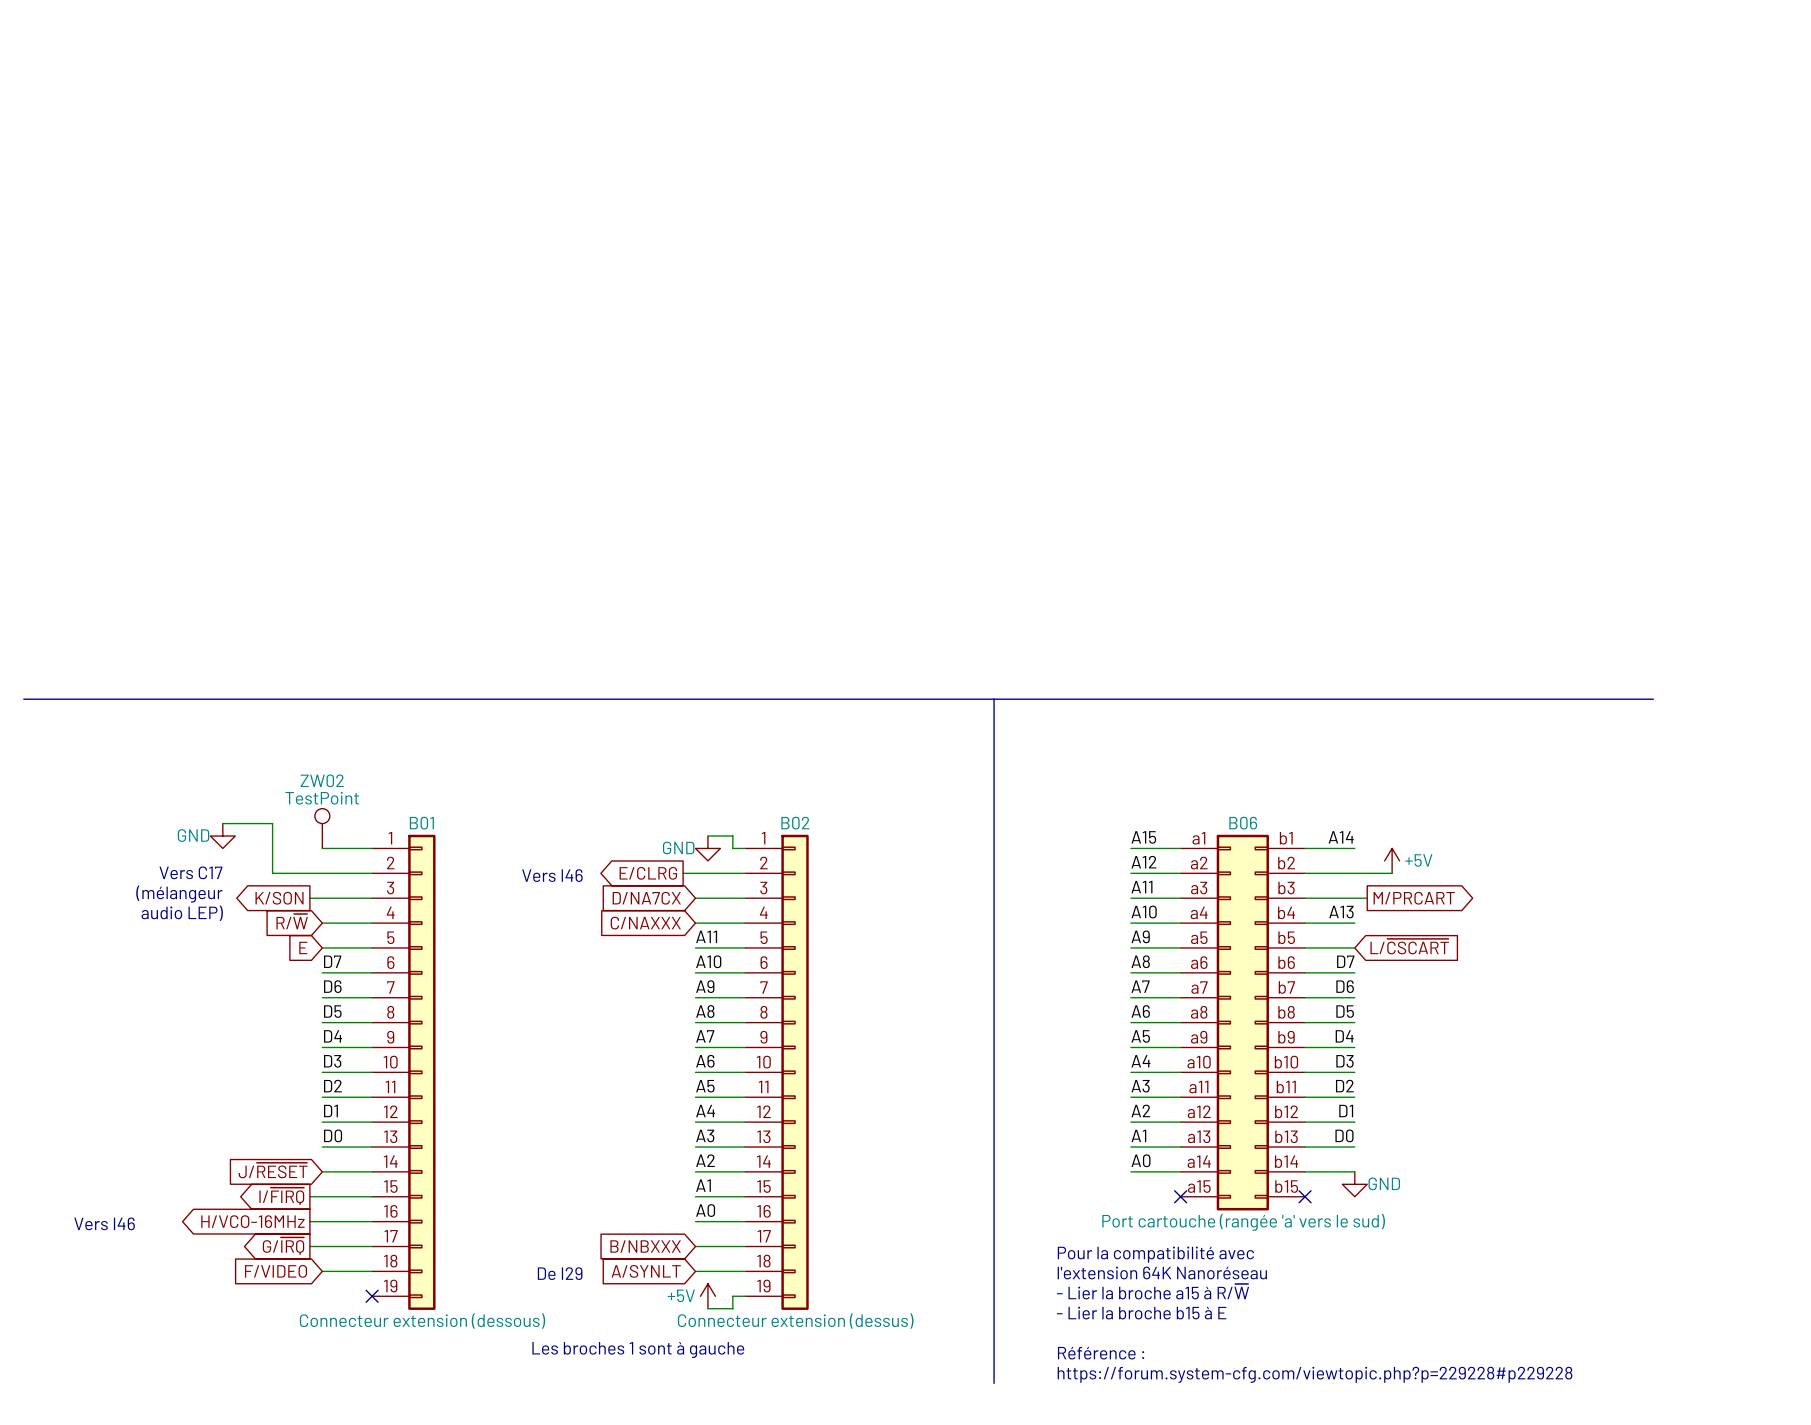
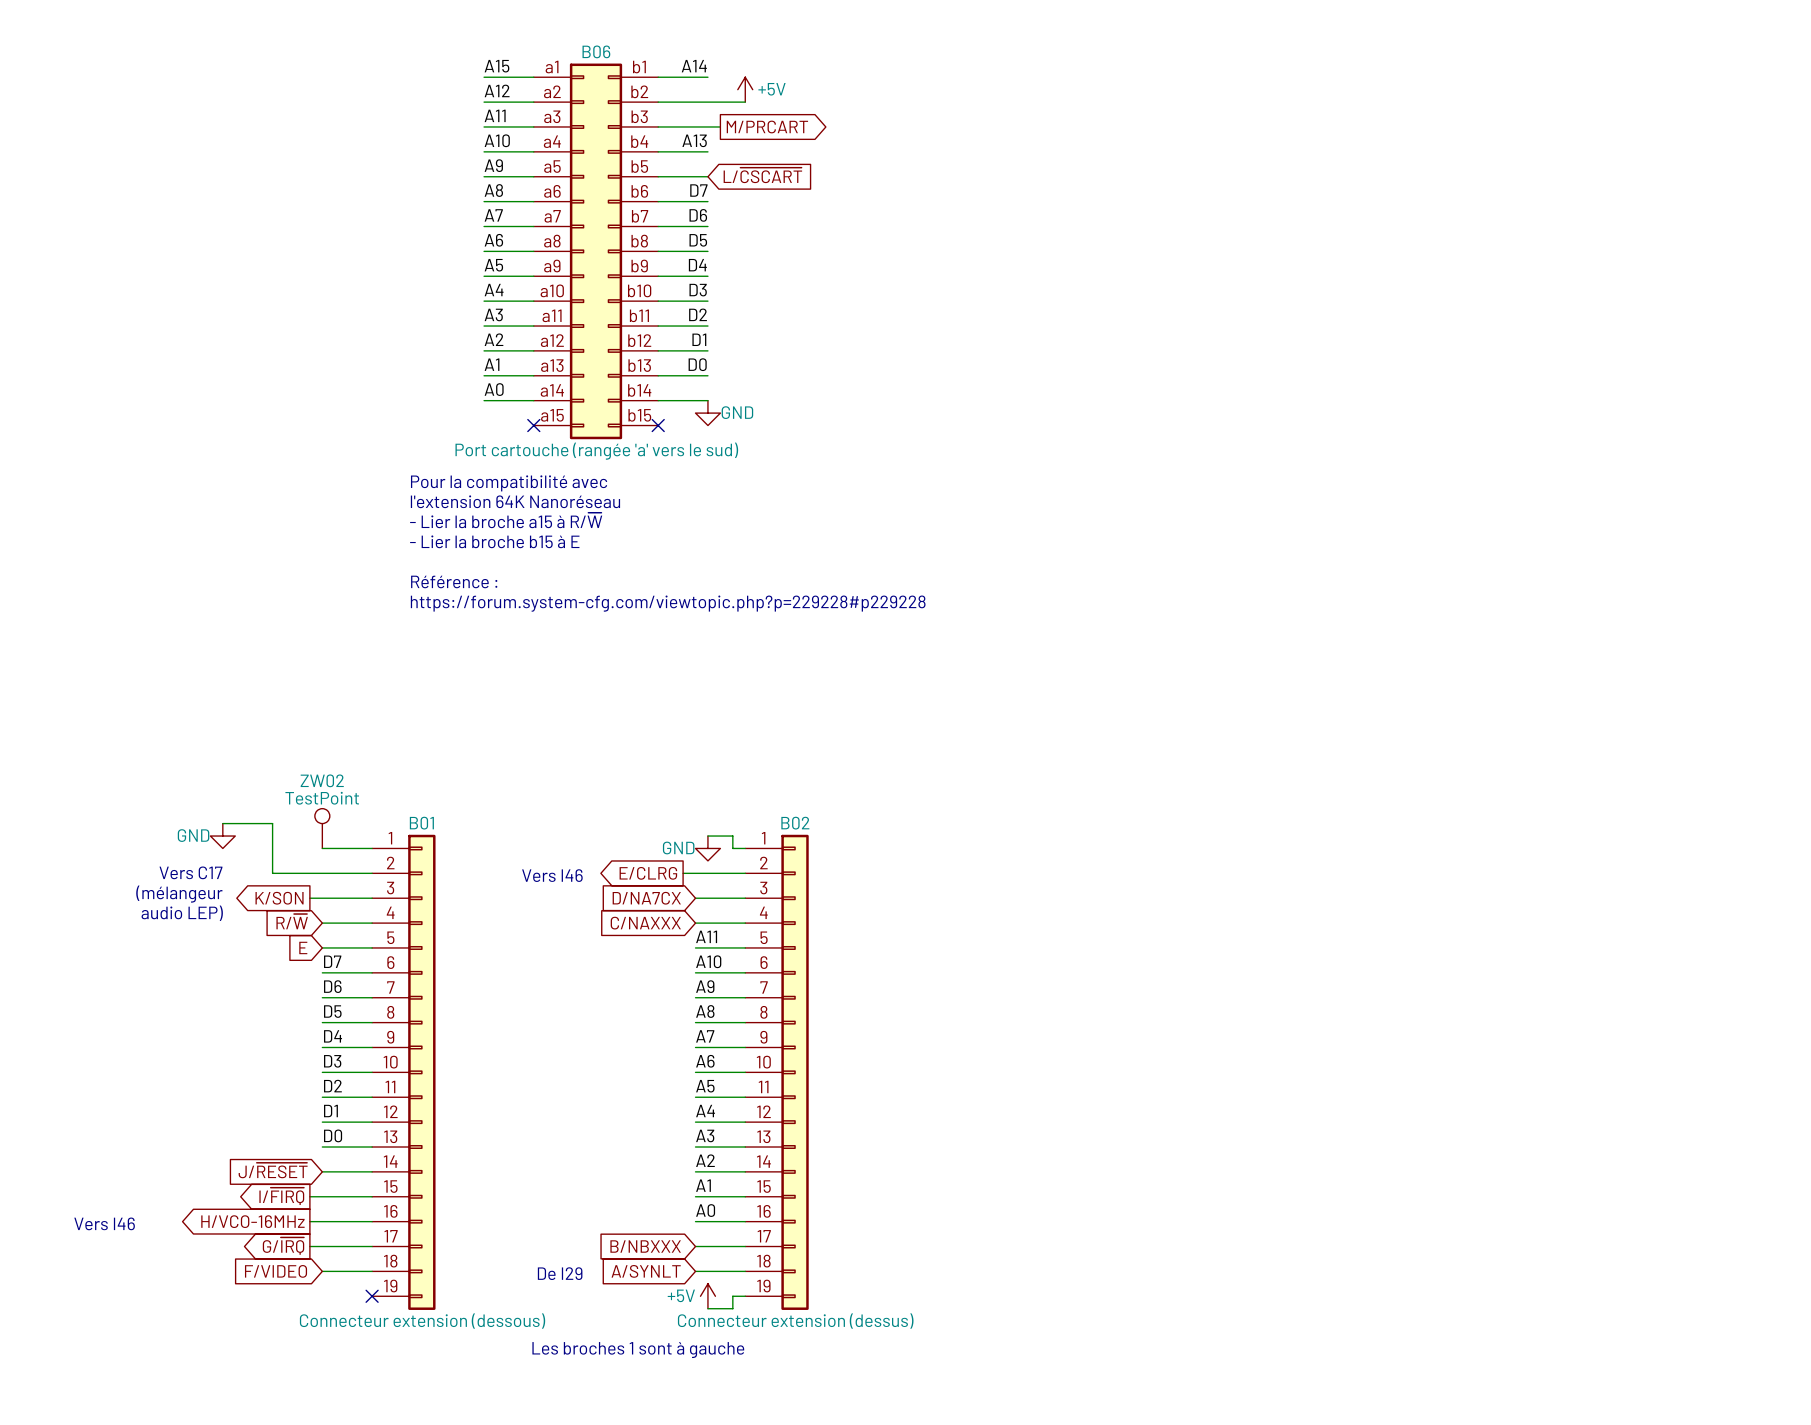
label: none -> A15 (496, 66)
label: none -> A14 (694, 66)
wire: none -> (484, 77) (533, 77)
wire: none -> (658, 77) (707, 77)
power symbol: none -> +5V (745, 89)
label: none -> A12 (497, 90)
wire: none -> (484, 102) (533, 102)
wire: none -> (658, 102) (745, 102)
label: none -> A11 (495, 115)
wire: none -> (484, 126) (533, 126)
wire: none -> (658, 126) (720, 126)
global label: none -> M/PRCART (767, 127)
label: none -> A10 (497, 140)
label: none -> A13 (694, 140)
wire: none -> (484, 151) (533, 151)
wire: none -> (658, 151) (707, 151)
label: none -> A9 (493, 165)
global label: none -> L/~{CSCART} (762, 175)
wire: none -> (484, 176) (533, 176)
wire: none -> (658, 176) (707, 176)
label: none -> A8 (493, 190)
label: none -> D7 (698, 190)
wire: none -> (484, 201) (533, 201)
wire: none -> (658, 201) (707, 201)
label: none -> A7 (493, 215)
label: none -> D6 (698, 215)
wire: none -> (484, 226) (533, 226)
wire: none -> (658, 226) (707, 226)
label: none -> A6 (493, 240)
label: none -> D5 (698, 240)
wire: none -> (484, 251) (533, 251)
wire: none -> (658, 251) (707, 251)
label: none -> A5 (493, 265)
label: none -> D4 (697, 265)
wire: none -> (484, 276) (533, 276)
wire: none -> (658, 276) (707, 276)
label: none -> A4 (494, 290)
label: none -> D3 (698, 290)
wire: none -> (484, 301) (533, 301)
wire: none -> (658, 301) (707, 301)
label: none -> A3 (493, 314)
label: none -> D2 (698, 314)
wire: none -> (484, 326) (533, 326)
wire: none -> (658, 326) (707, 326)
label: none -> A2 (493, 339)
label: none -> D1 (699, 339)
wire: none -> (484, 350) (533, 350)
wire: none -> (658, 350) (707, 350)
label: none -> A1 (492, 364)
label: none -> D0 (697, 364)
wire: none -> (484, 375) (533, 375)
wire: none -> (658, 375) (707, 375)
label: none -> A0 (494, 389)
wire: none -> (484, 400) (533, 400)
wire: none -> (658, 400) (707, 400)
power symbol: none -> GND (707, 413)
no-connect mark: none -> (533, 425)
no-connect mark: none -> (658, 425)
text: none -> Pour la compatibilité avec (509, 483)
text: none -> l'extension 64K Nanoréseau (515, 501)
text: none -> - Lier la broche a15 à R/~{W} (506, 520)
text: none -> - Lier la broche b15 à E (494, 541)
text: none -> Référence : (454, 581)
text: none -> https://forum.system-cfg.com/viewtopic.php?p=229228#p229228 (668, 603)
line: (23, 699) (1653, 699) -> none
line: (994, 699) (994, 1383) -> none
label: A15 (1143, 837) -> none
label: A14 (1341, 837) -> none
wire: (1130, 848) (1180, 848) -> none
wire: (1305, 848) (1354, 848) -> none
power symbol: +5V (1392, 860) -> none
label: A12 (1143, 862) -> none
wire: (1130, 873) (1180, 873) -> none
wire: (1305, 873) (1392, 873) -> none
label: A11 (1141, 887) -> none
wire: (1130, 898) (1180, 898) -> none
wire: (1305, 898) (1367, 898) -> none
global label: M/PRCART (1414, 898) -> none
label: A10 (1144, 912) -> none
label: A13 (1341, 912) -> none
wire: (1130, 923) (1180, 923) -> none
wire: (1305, 923) (1354, 923) -> none
label: A9 (1140, 936) -> none
global label: L/~{CSCART} (1409, 946) -> none
wire: (1130, 947) (1180, 947) -> none
wire: (1305, 947) (1354, 947) -> none
label: A8 (1140, 961) -> none
label: D7 (1345, 961) -> none
wire: (1130, 972) (1180, 972) -> none
wire: (1305, 972) (1354, 972) -> none
label: A7 (1140, 986) -> none
label: D6 (1345, 986) -> none
wire: (1130, 997) (1180, 997) -> none
wire: (1305, 997) (1354, 997) -> none
label: A6 (1140, 1011) -> none
label: D5 (1345, 1011) -> none
wire: (1130, 1022) (1180, 1022) -> none
B06 position: (1242, 1022) -> (596, 251)
wire: (1305, 1022) (1354, 1022) -> none
label: A5 (1140, 1036) -> none
label: D4 (1344, 1036) -> none
wire: (1130, 1047) (1180, 1047) -> none
wire: (1305, 1047) (1354, 1047) -> none
label: A4 (1140, 1061) -> none
label: D3 (1344, 1061) -> none
wire: (1130, 1072) (1180, 1072) -> none
wire: (1305, 1072) (1354, 1072) -> none
label: A3 (1140, 1086) -> none
label: D2 (1344, 1086) -> none
wire: (1130, 1097) (1180, 1097) -> none
wire: (1305, 1097) (1354, 1097) -> none
label: A2 (1140, 1110) -> none
label: D1 (1346, 1111) -> none
wire: (1130, 1122) (1180, 1122) -> none
wire: (1305, 1122) (1354, 1122) -> none
label: A1 (1138, 1135) -> none
label: D0 (1344, 1135) -> none
wire: (1130, 1147) (1180, 1147) -> none
wire: (1305, 1147) (1354, 1147) -> none
label: A0 (1140, 1160) -> none
wire: (1130, 1171) (1180, 1171) -> none
wire: (1305, 1171) (1354, 1171) -> none
power symbol: GND (1354, 1184) -> none
no-connect mark: (1180, 1196) -> none
no-connect mark: (1305, 1196) -> none
text: Pour la compatibilité avec (1155, 1254) -> none
text: l'extension 64K Nanoréseau (1162, 1273) -> none
text: - Lier la broche a15 à R/~{W} (1153, 1291) -> none
text: - Lier la broche b15 à E (1141, 1313) -> none
text: Référence : (1101, 1353) -> none
text: https://forum.system-cfg.com/viewtopic.php?p=229228#p229228 (1315, 1374) -> none

